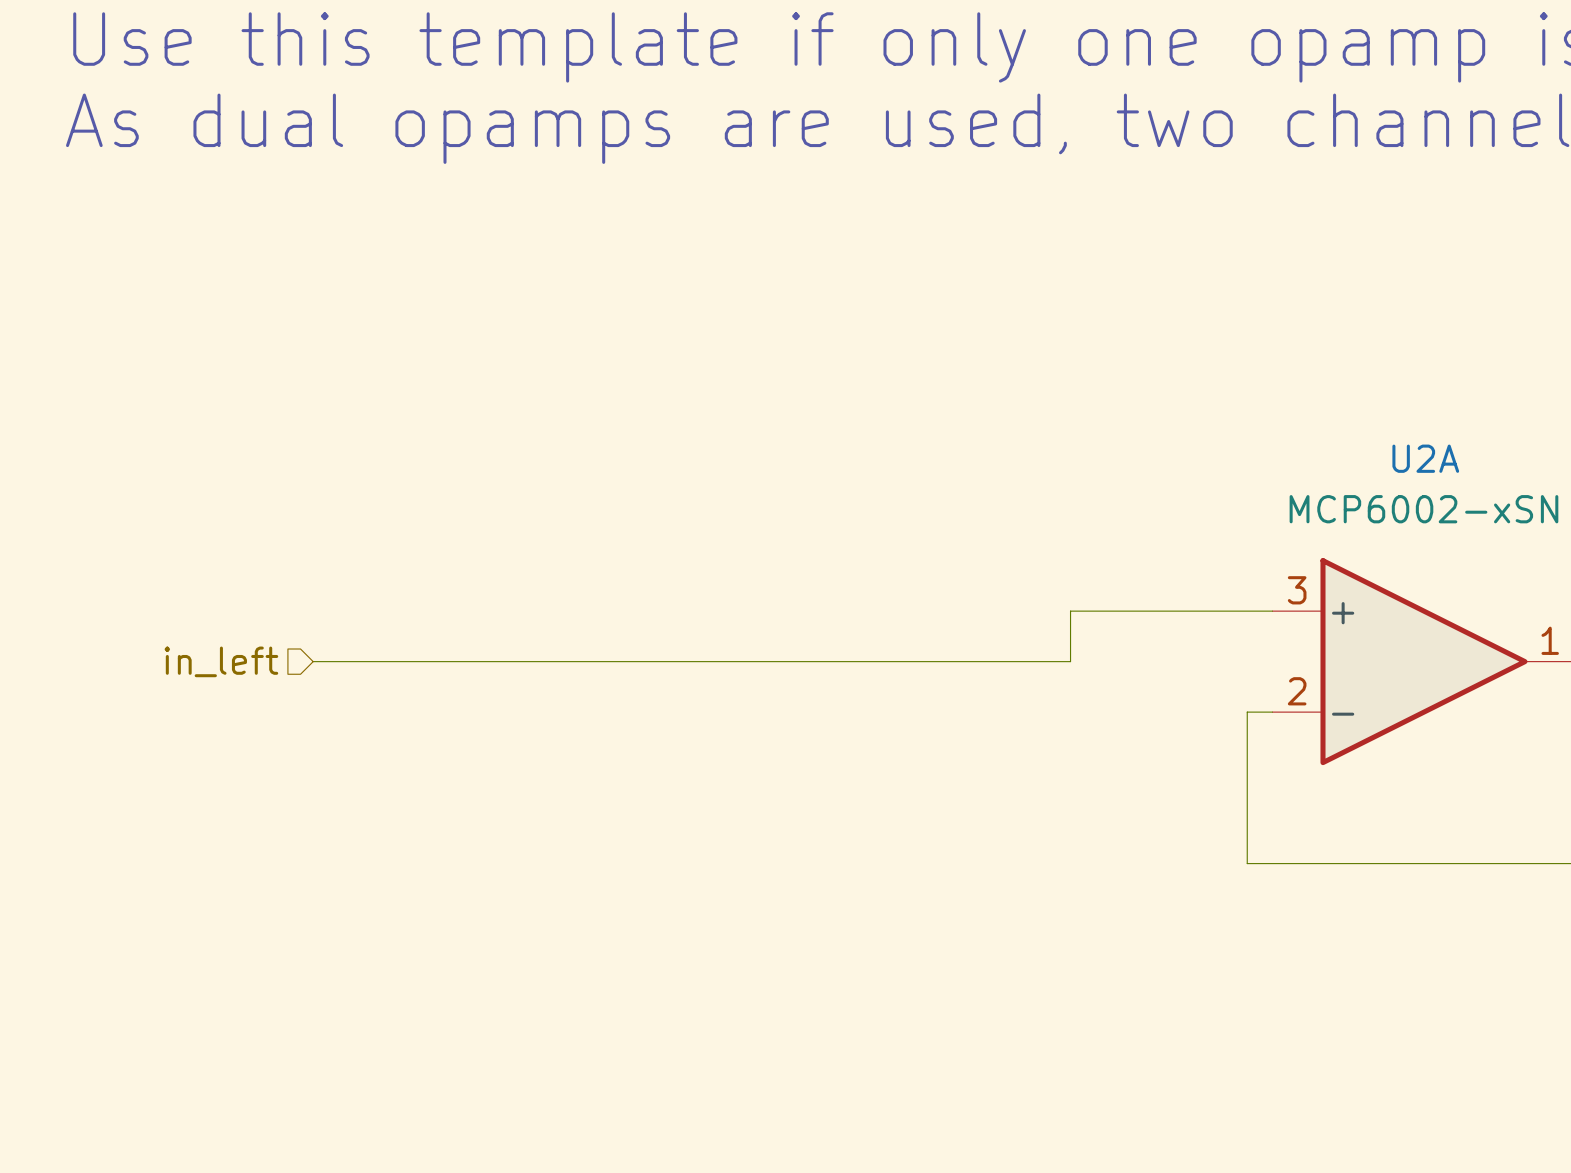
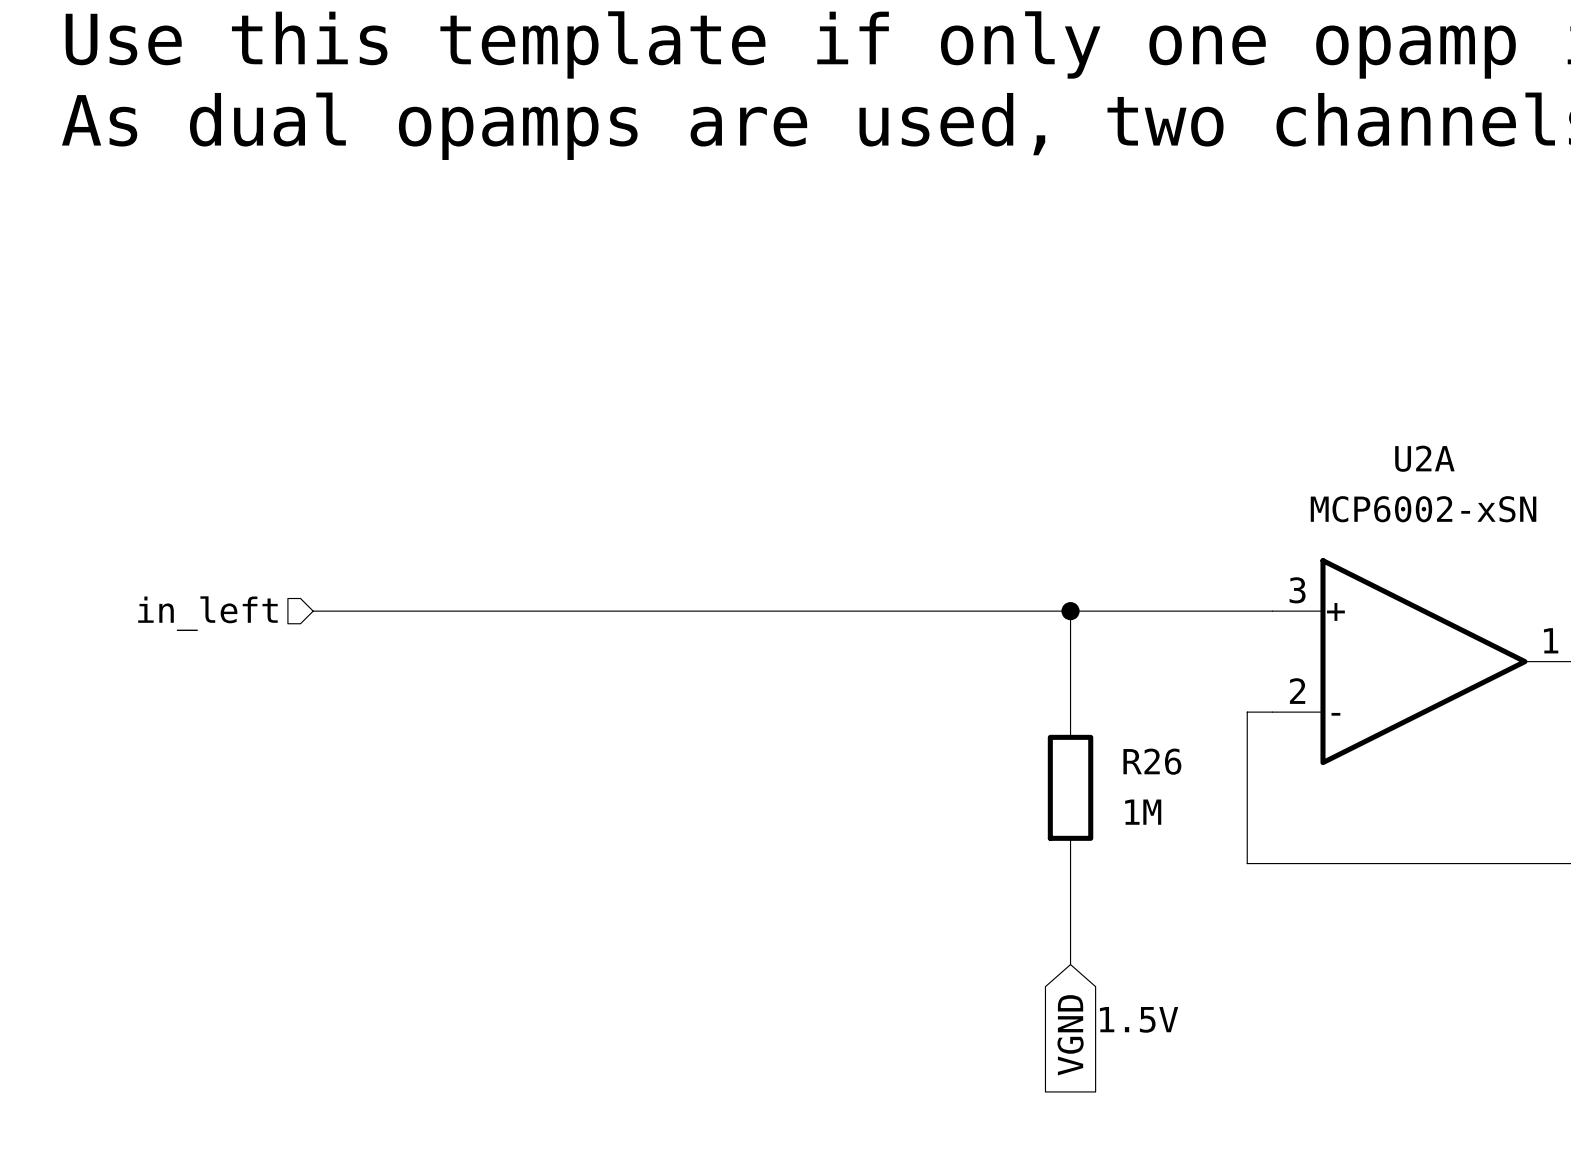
wire: none -> (313, 611) (1070, 611)
junction: none -> (1070, 611)
hierarchical label position: in_left (221, 661) -> in_left (207, 613)
wire: (313, 661) (1070, 661) -> (1070, 712) (1070, 661)
R26: none -> 1M (1070, 787)
wire: none -> (1070, 863) (1070, 964)
text: none -> 1.5V (1139, 1019)
global label: none -> VGND (1070, 1035)

